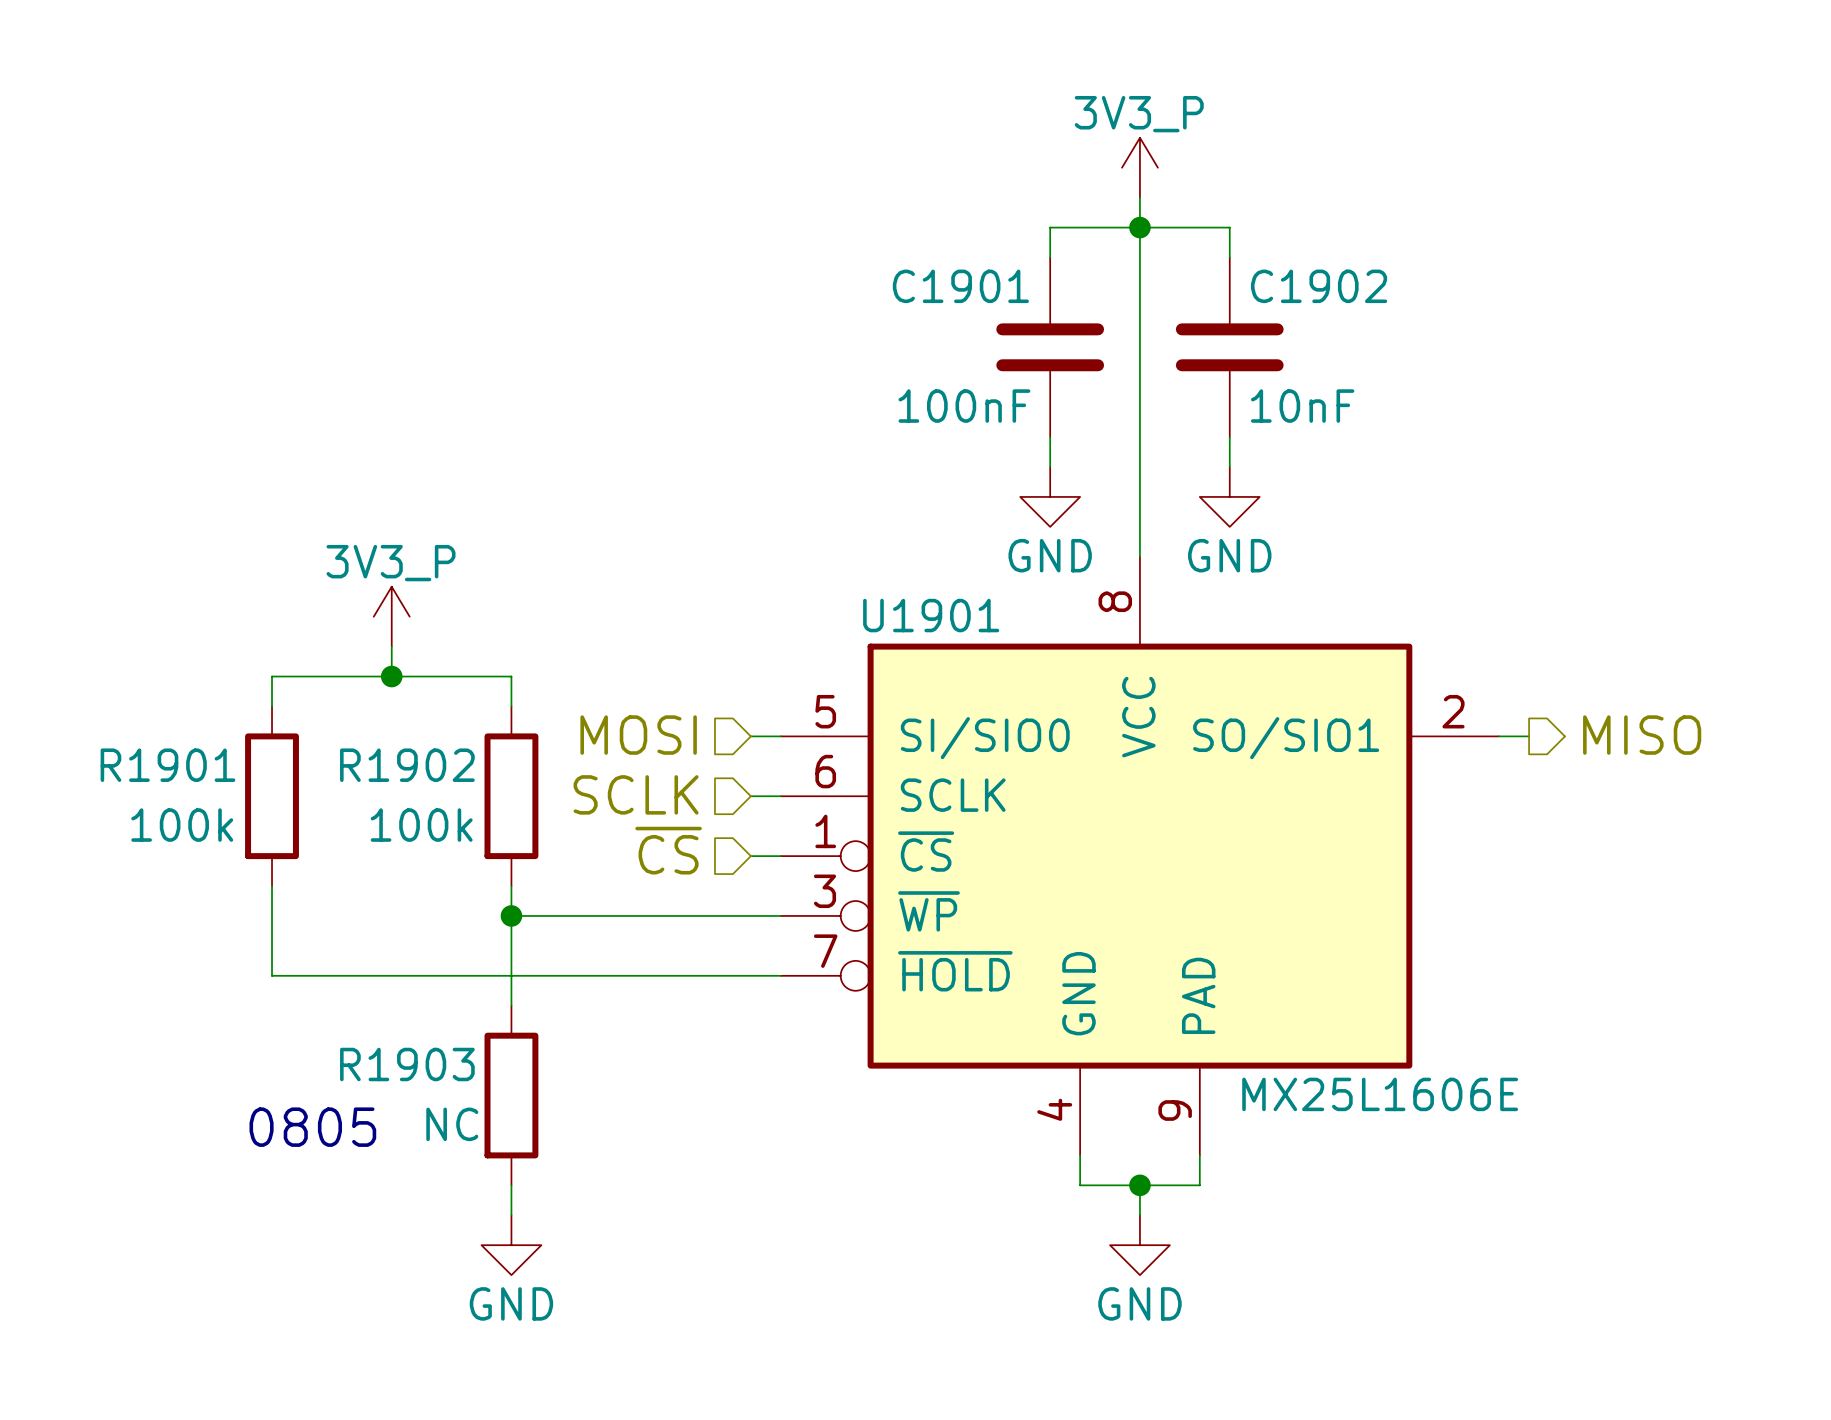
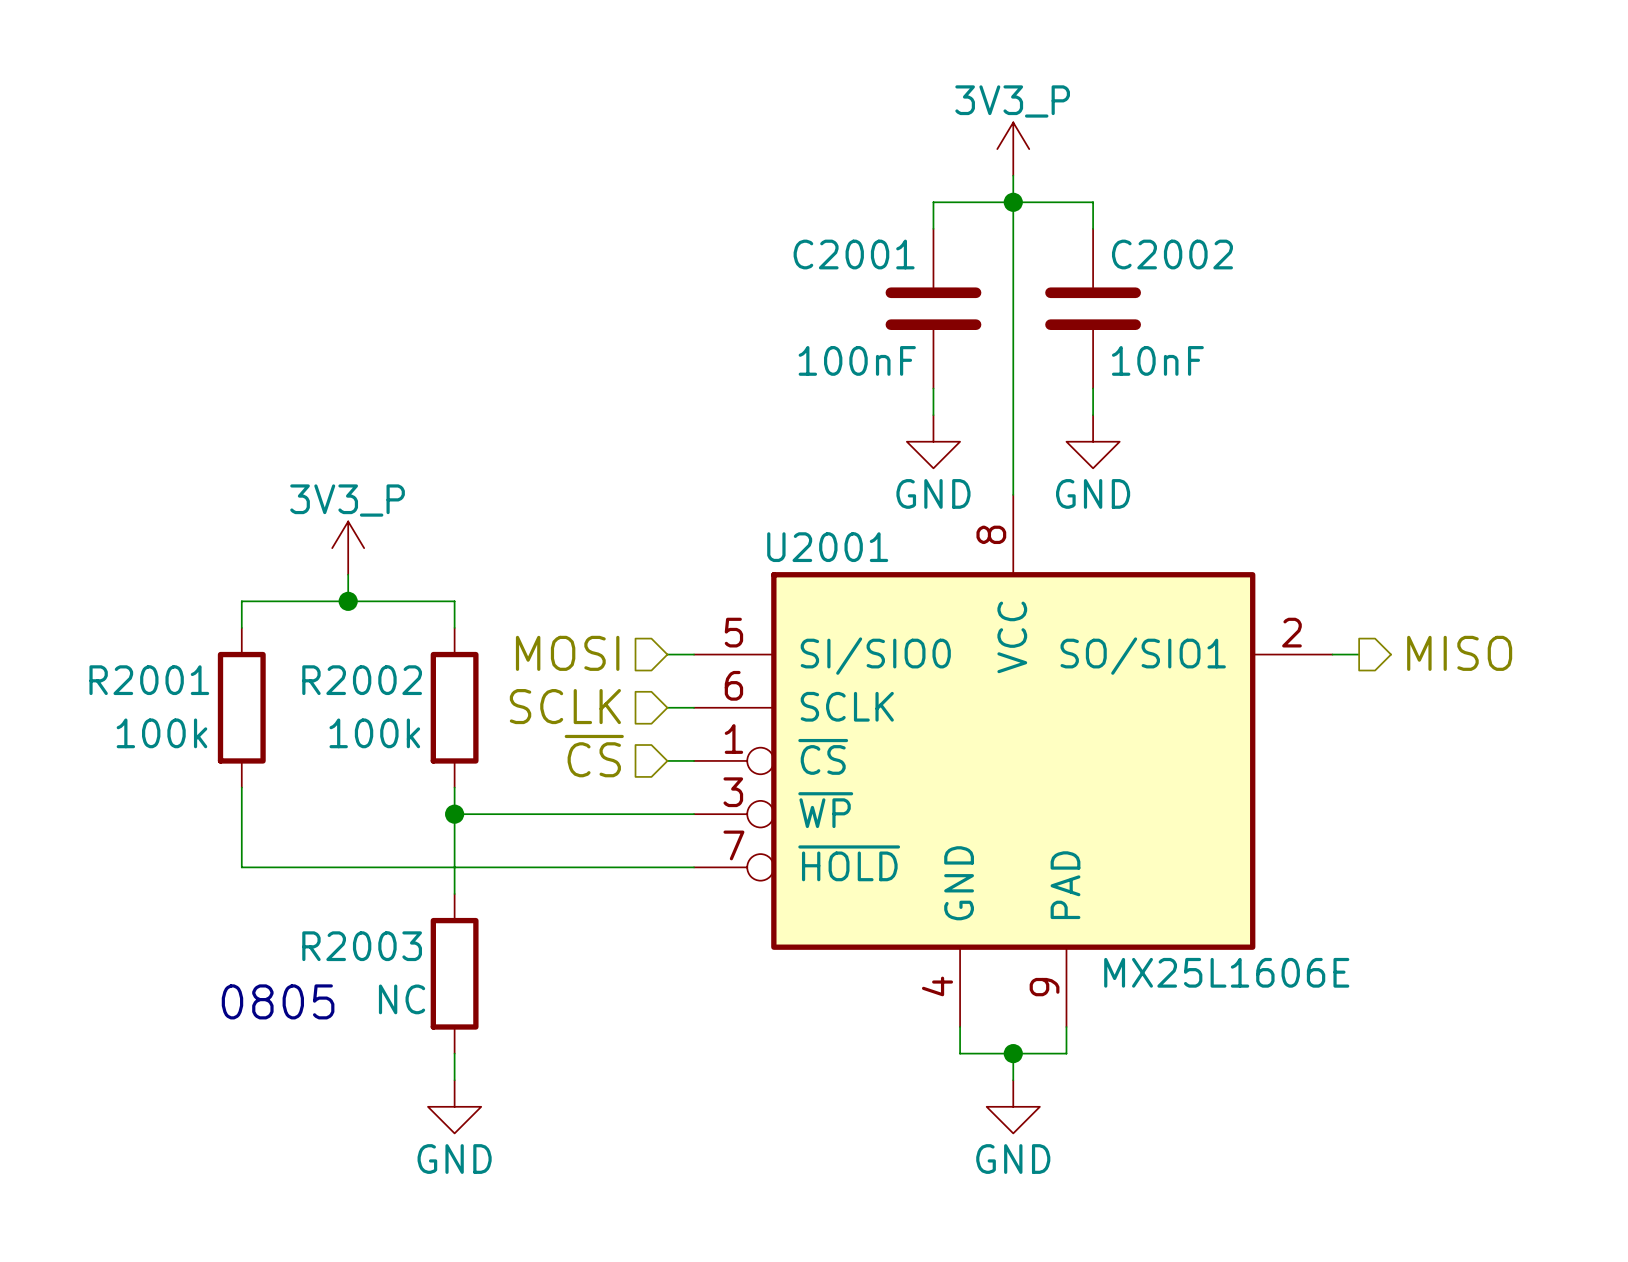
C1901 name: C1901 (960, 286) -> C2001 (854, 254)
C1902 name: C1902 (1319, 286) -> C2002 (1172, 254)
U1901 name: U1901 (931, 615) -> U2001 (827, 547)
R1901 name: R1901 (167, 765) -> R2001 (149, 680)
R1902 name: R1902 (407, 765) -> R2002 (362, 680)
R1903 name: R1903 (407, 1064) -> R2003 (362, 946)

